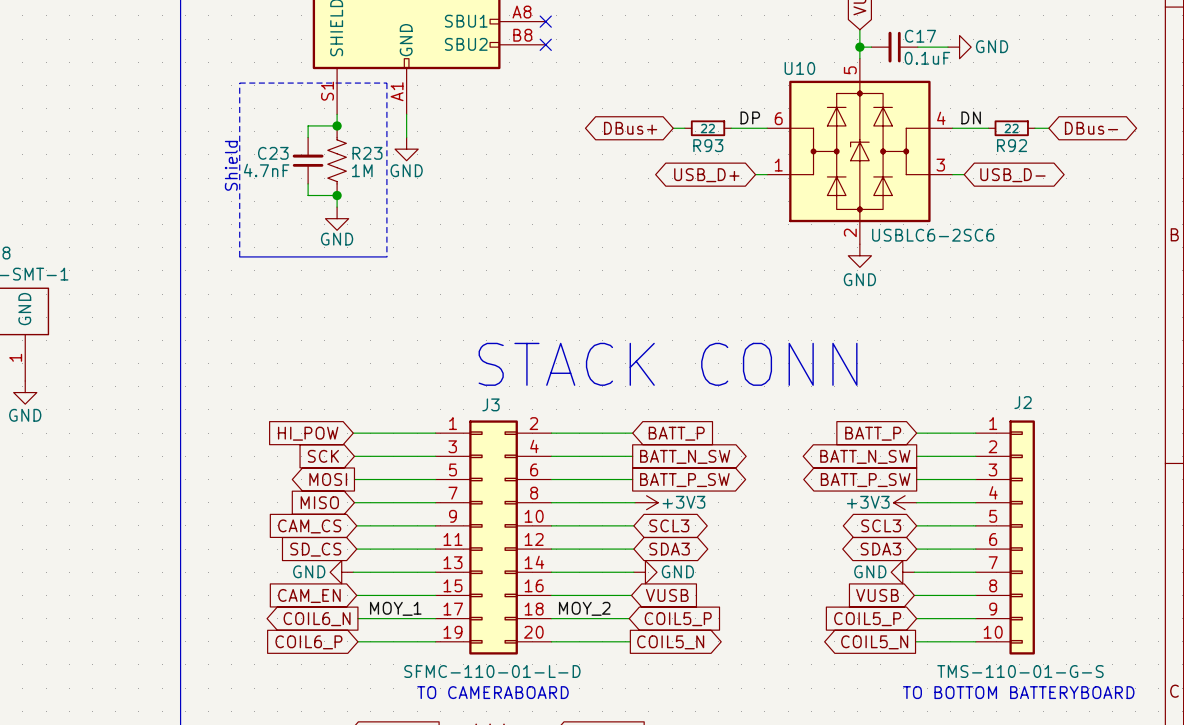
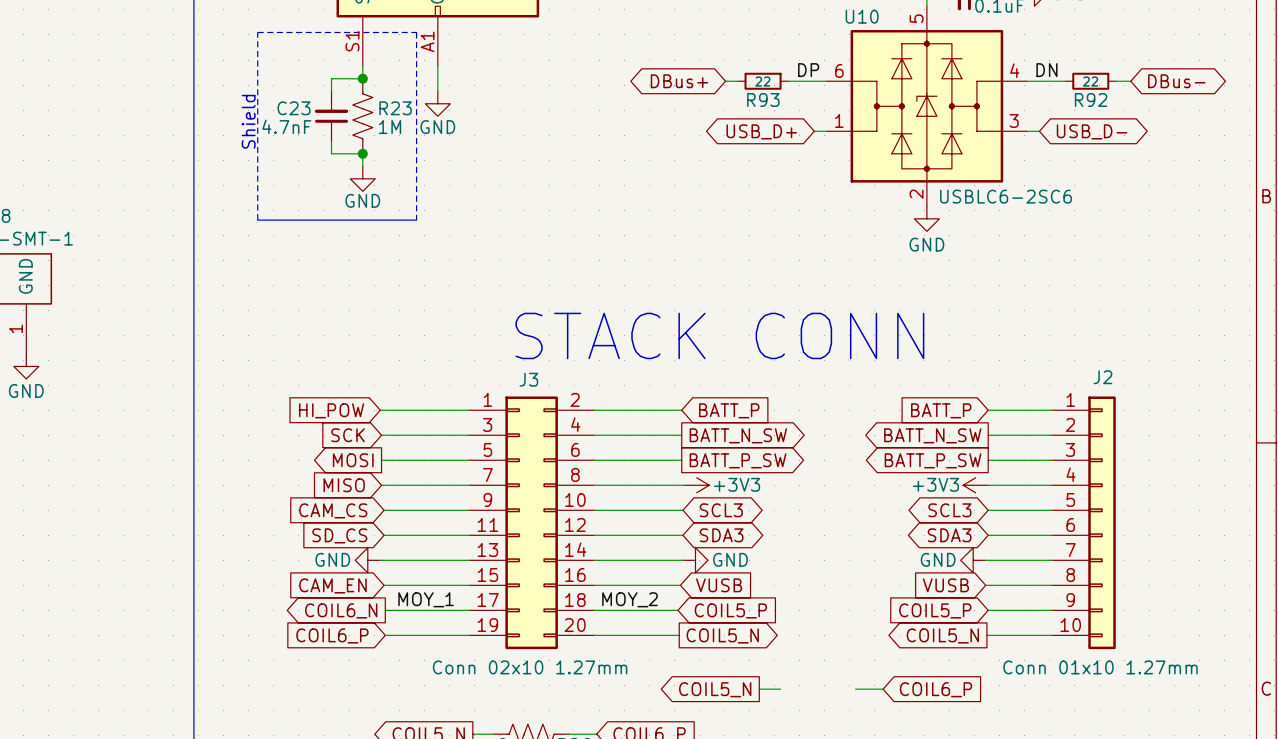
J3 value: SFMC-110-01-L-D (492, 671) -> Conn 02x10 1.27mm (530, 667)
J2 value: TMS-110-01-G-S (1020, 671) -> Conn 01x10 1.27mm (1100, 667)
wire: none -> (759, 689) (780, 689)
wire: none -> (855, 689) (883, 689)
text: TO CAMERABOARD (492, 692) -> none
global label: none -> COIL5_N (715, 689)
global label: none -> COIL6_P (936, 689)
text: TO BOTTOM BATTERYBOARD (1018, 692) -> none

